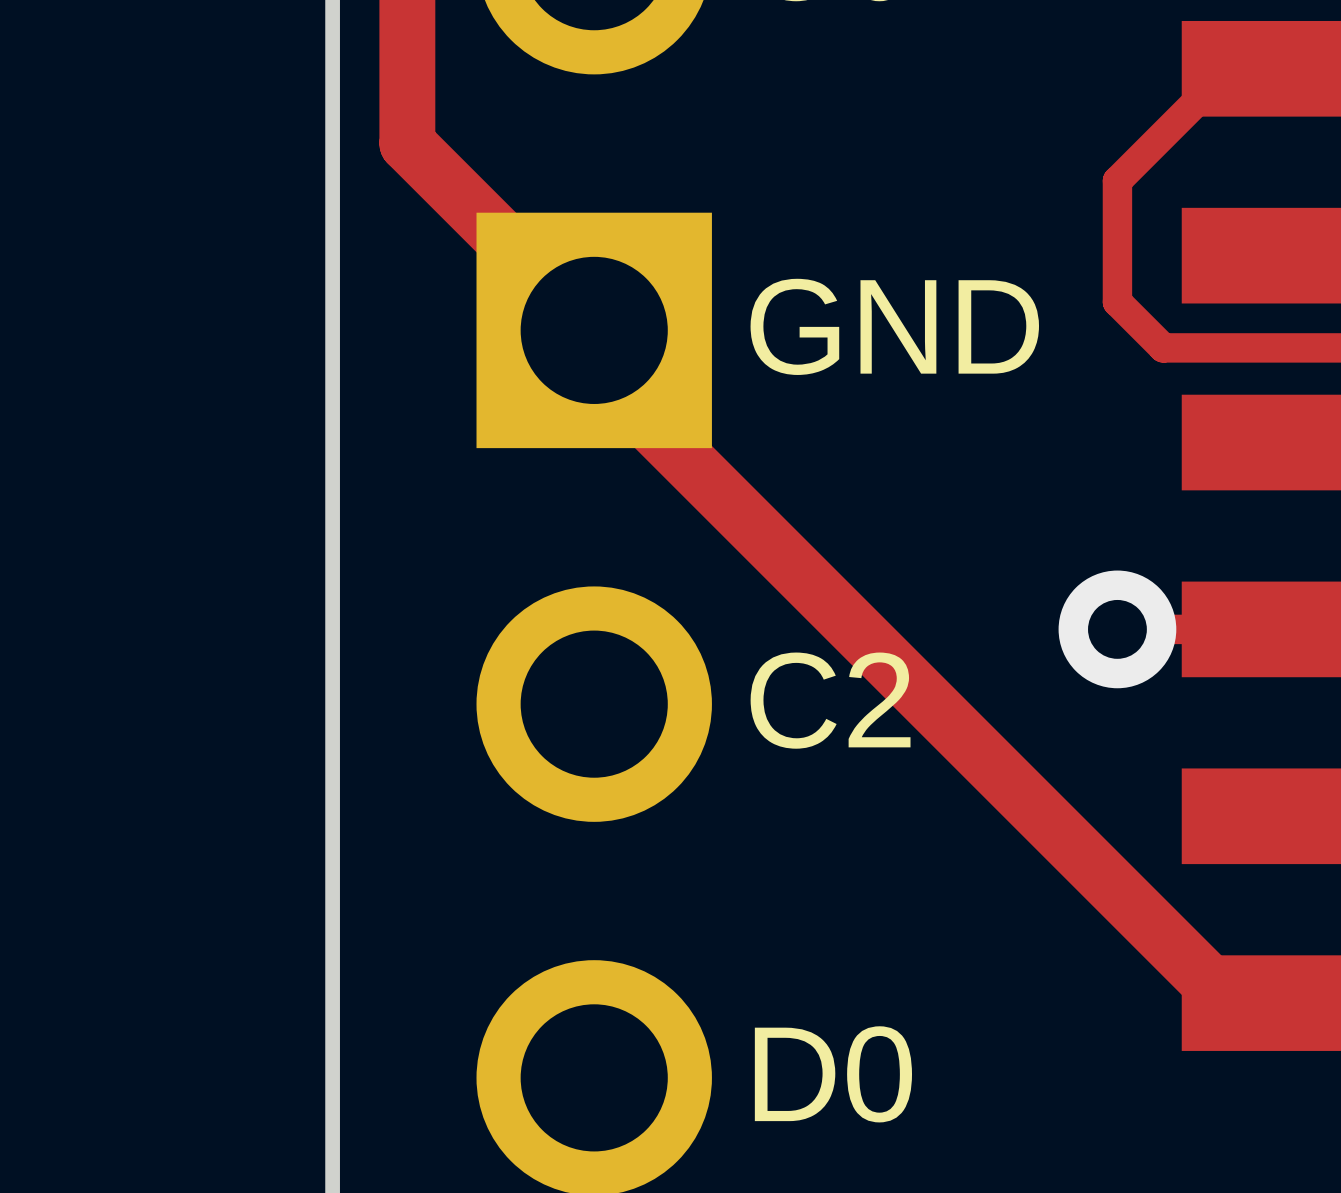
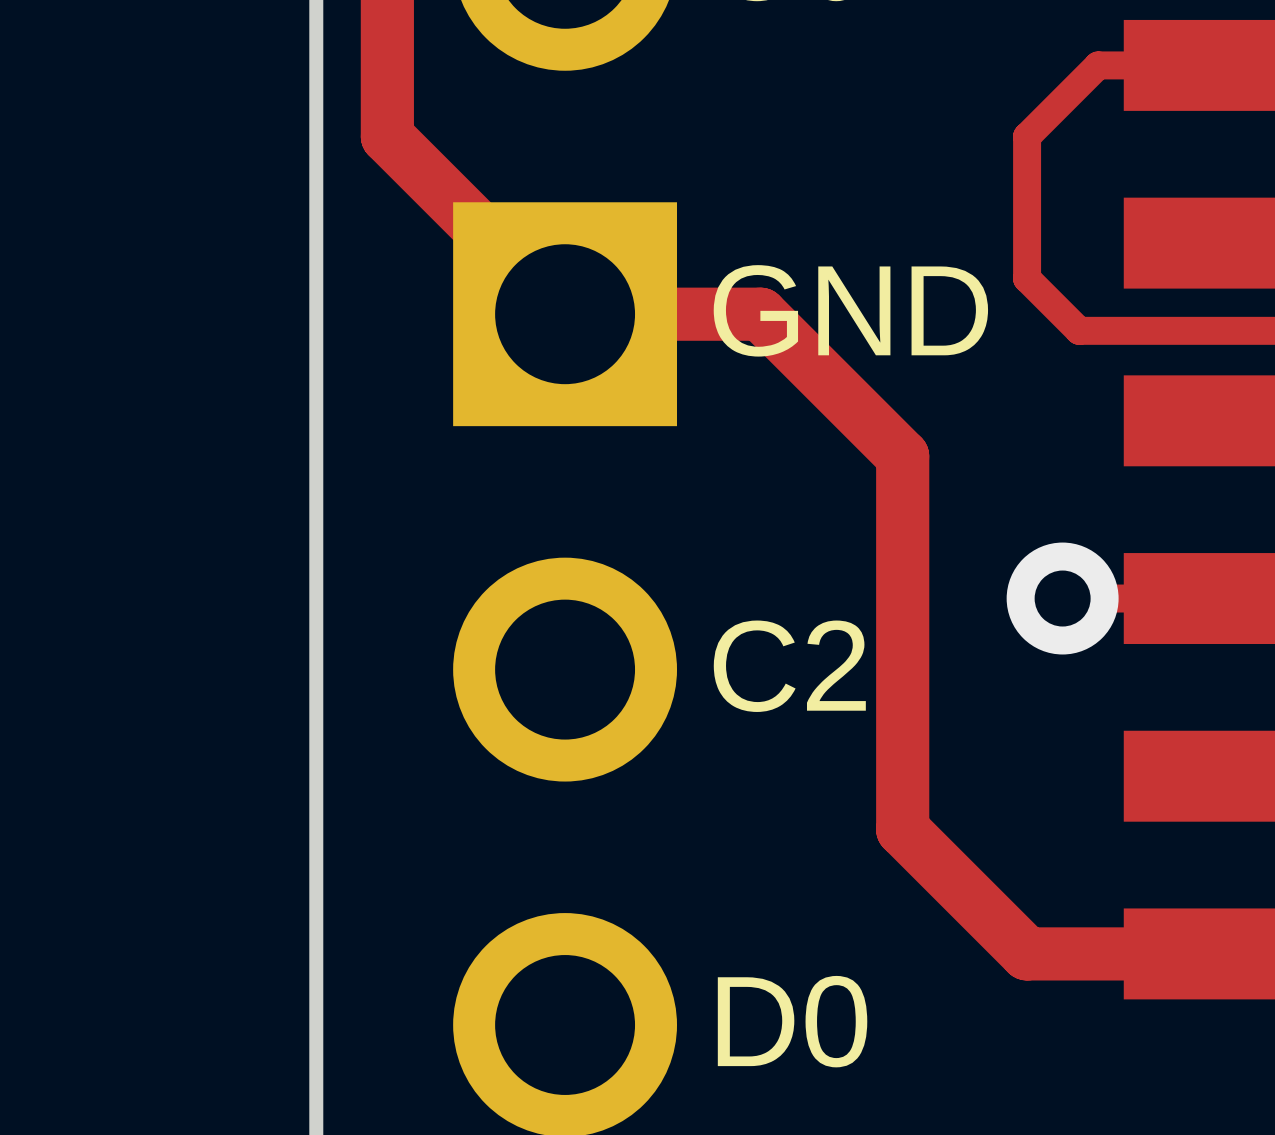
track: (1229, 68) (1117, 180) (1117, 302) (1163, 347) -> (1169, 65) (1098, 65) (1027, 136) (1027, 278) (1079, 330) (1106, 330)
track: none -> (565, 314) (760, 314) (902, 456) (902, 829) (1027, 953) (1232, 953)
track: (594, 367) (1229, 1003) -> none

